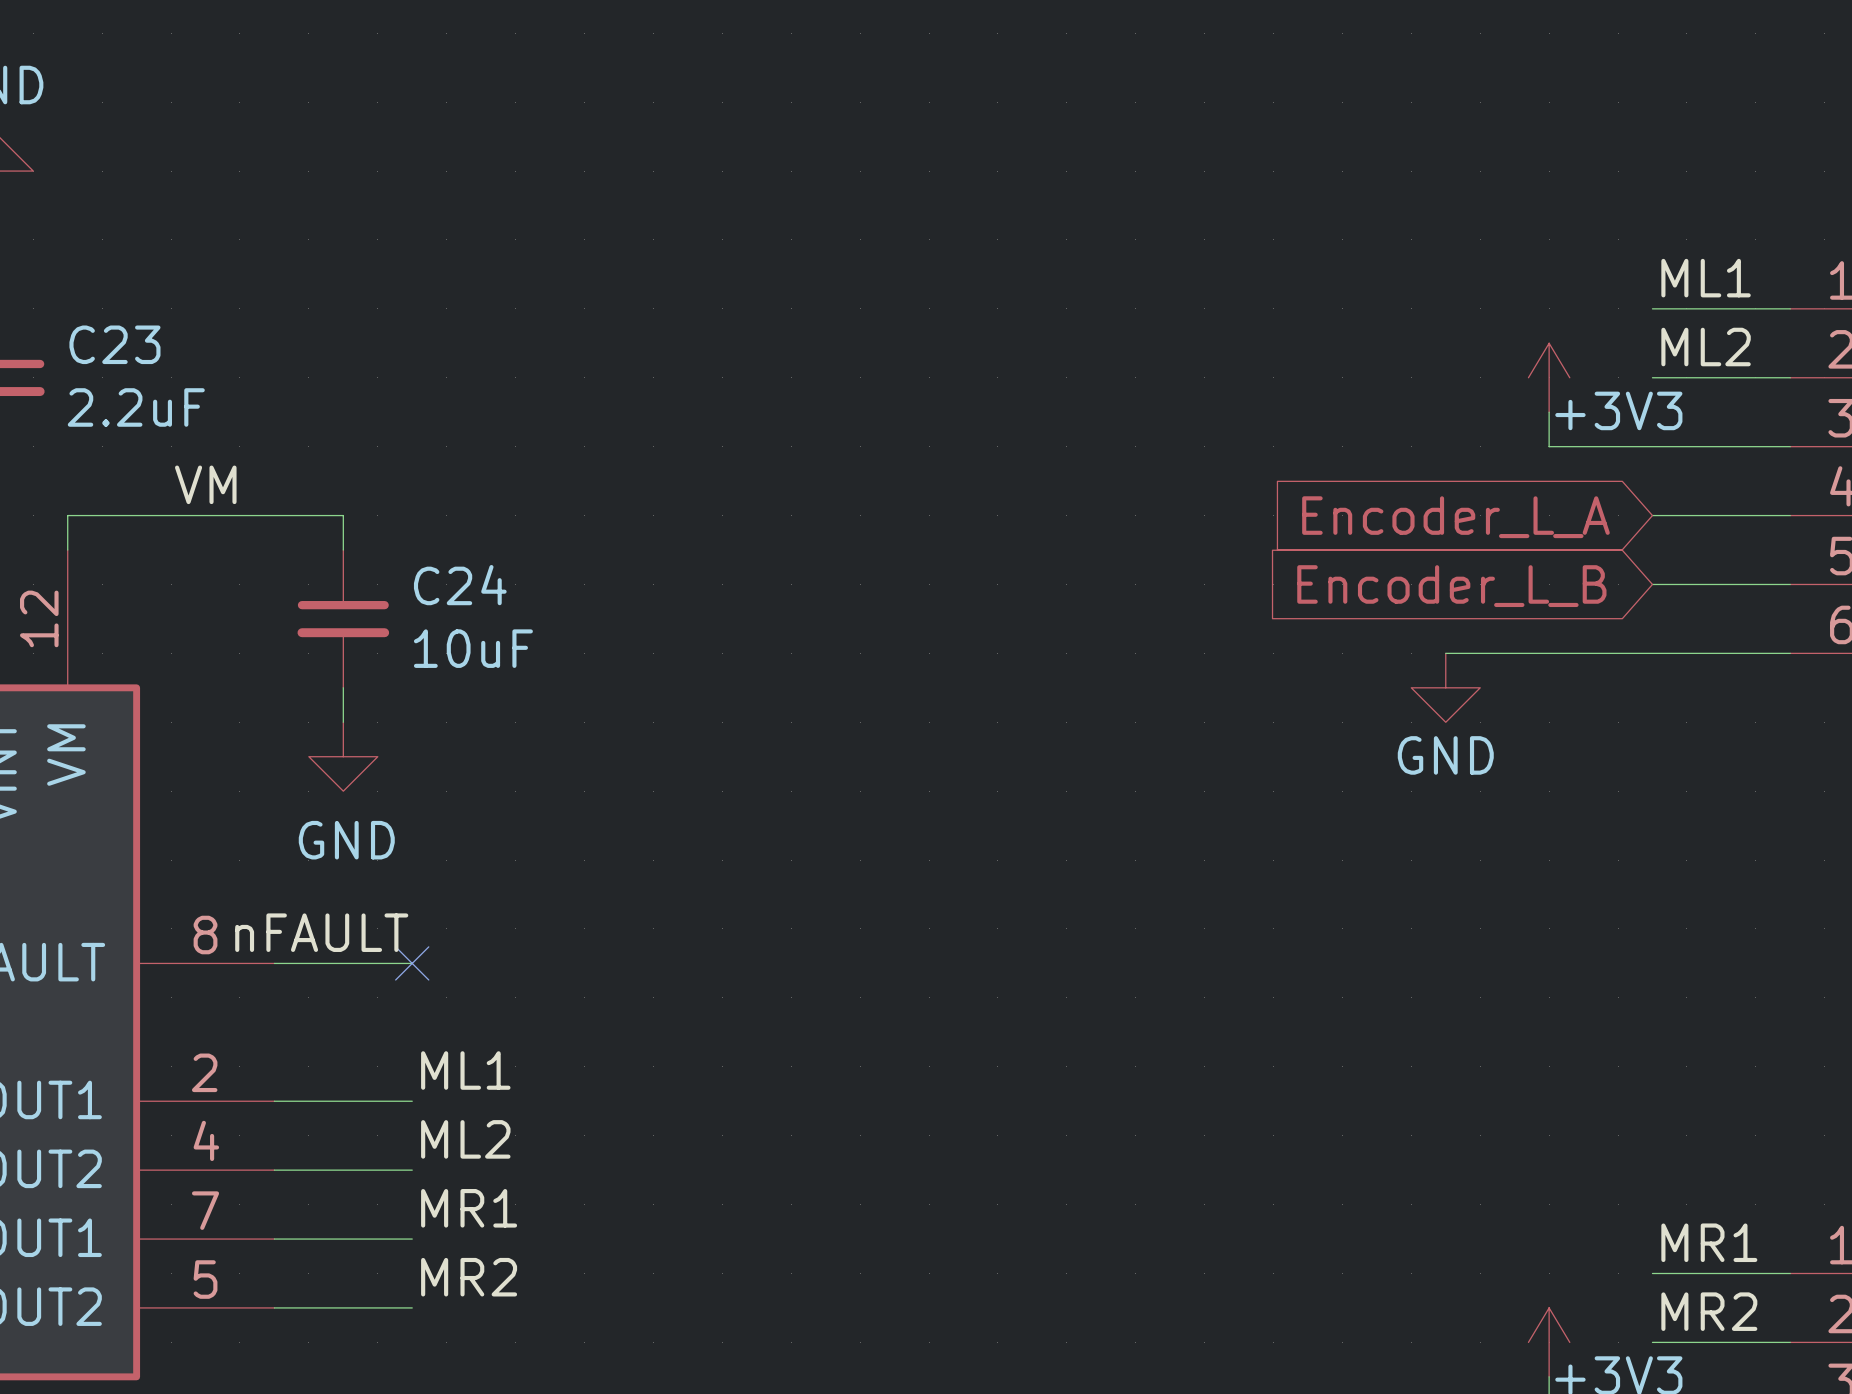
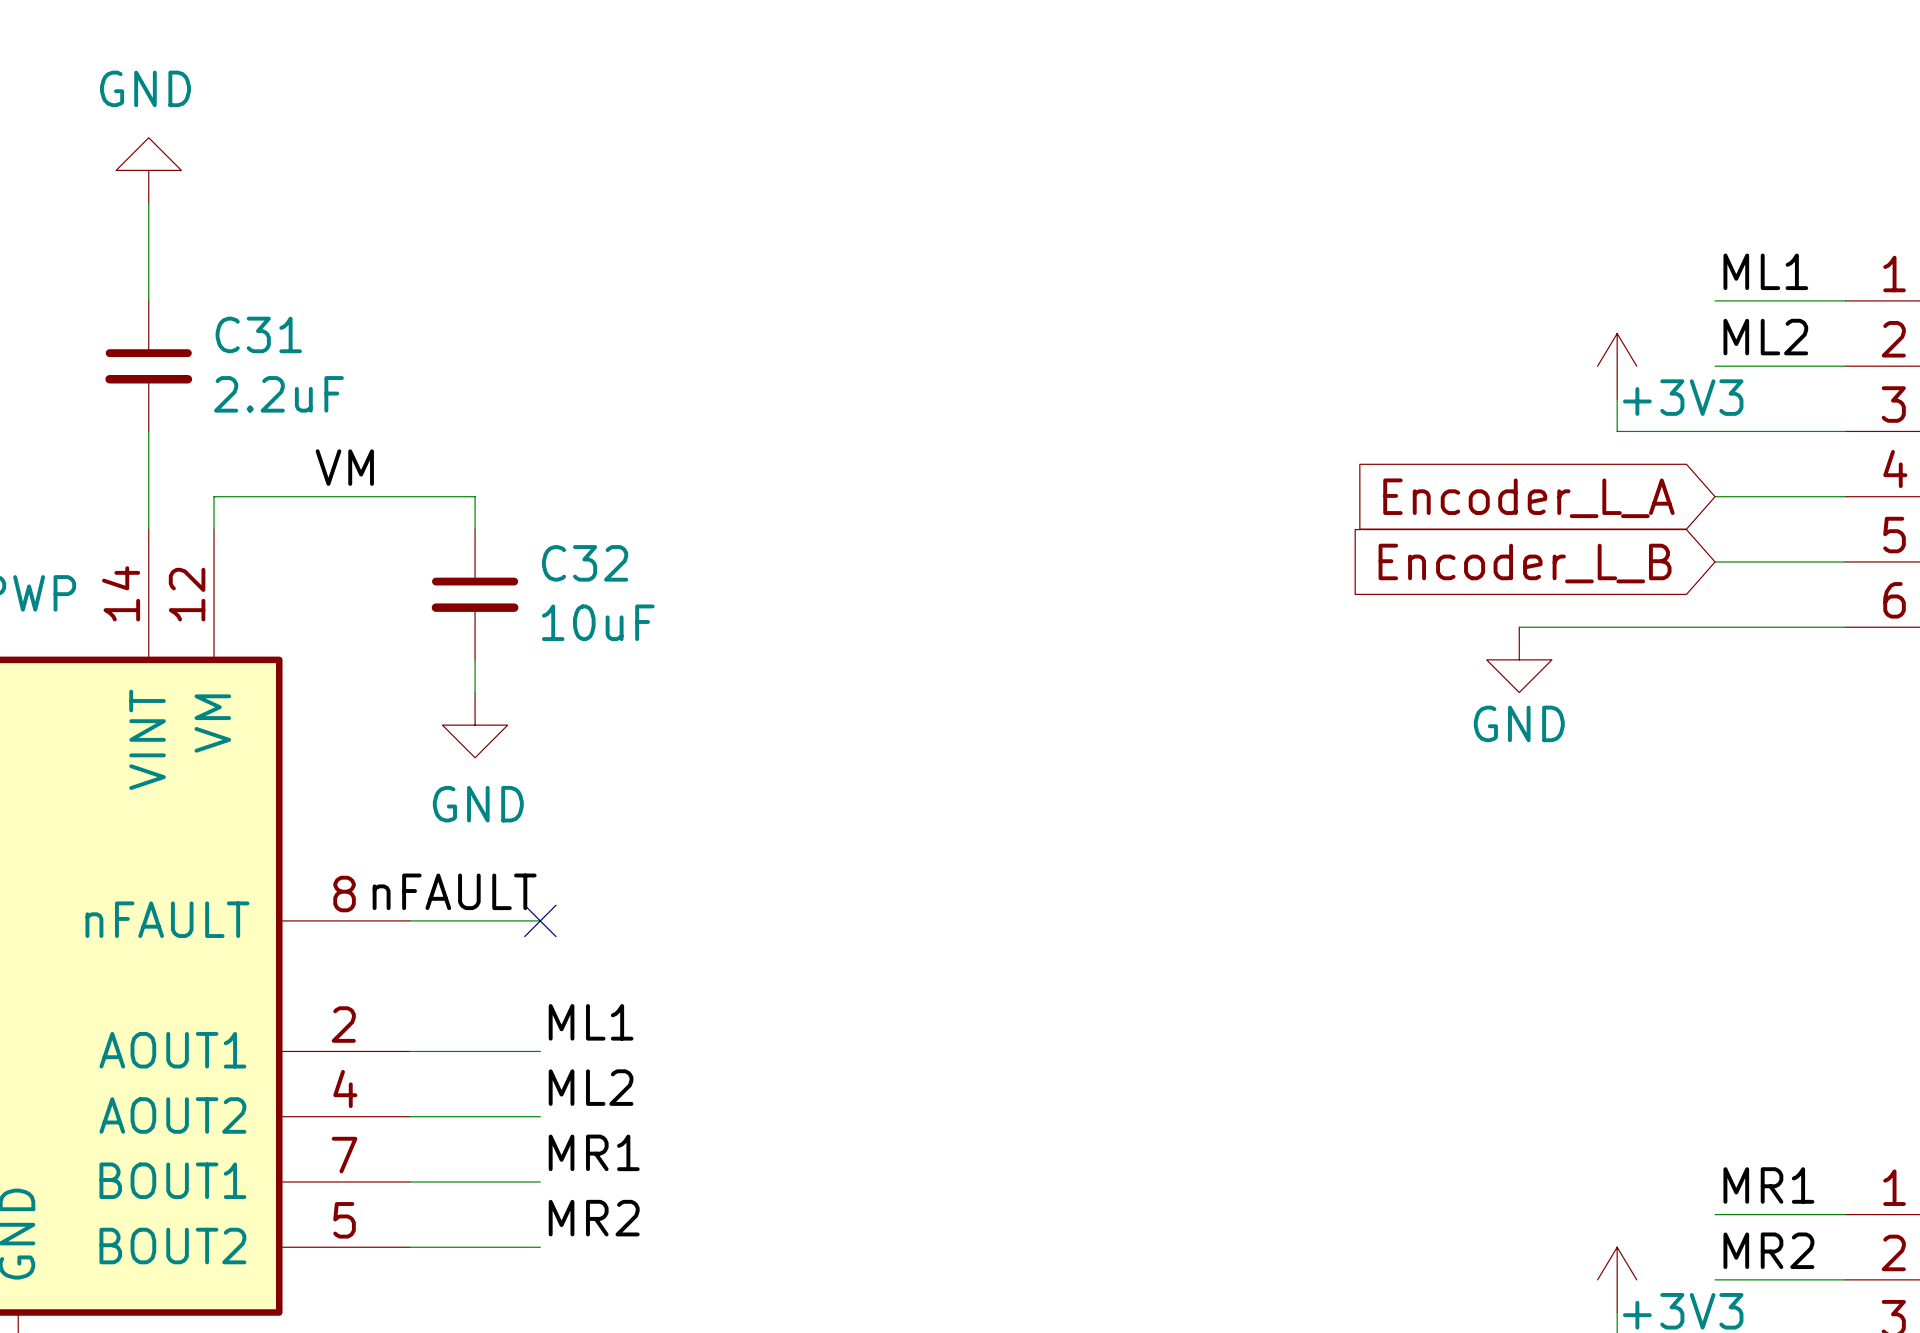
C23 name: C23 (114, 344) -> C31 (258, 334)
C24 name: C24 (460, 585) -> C32 (585, 563)

